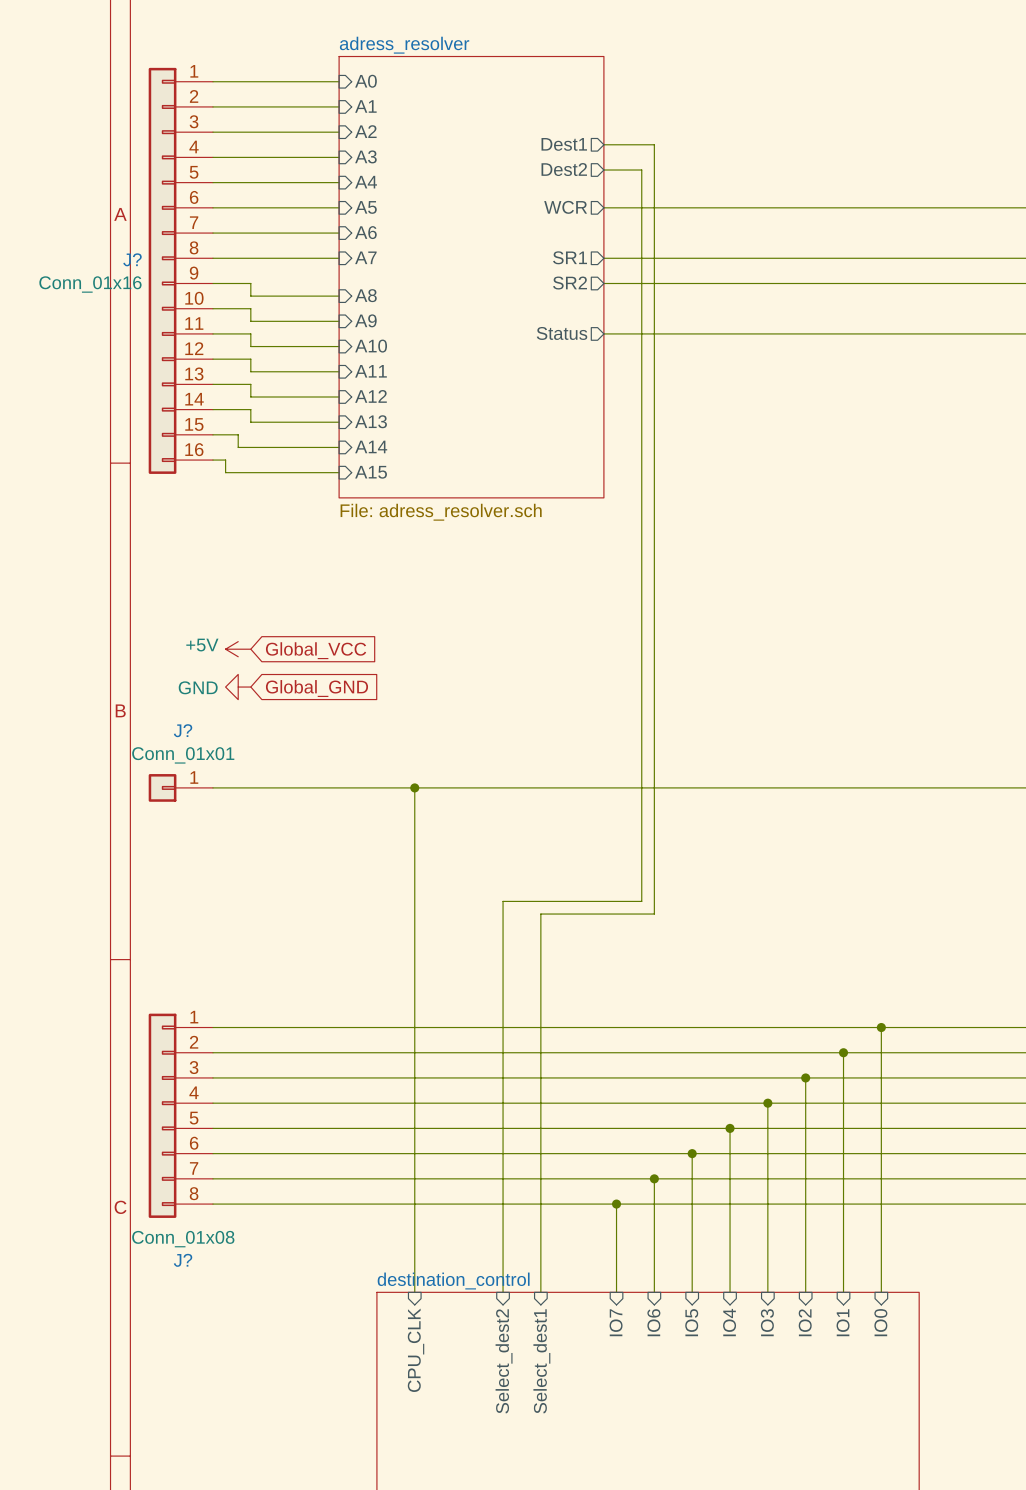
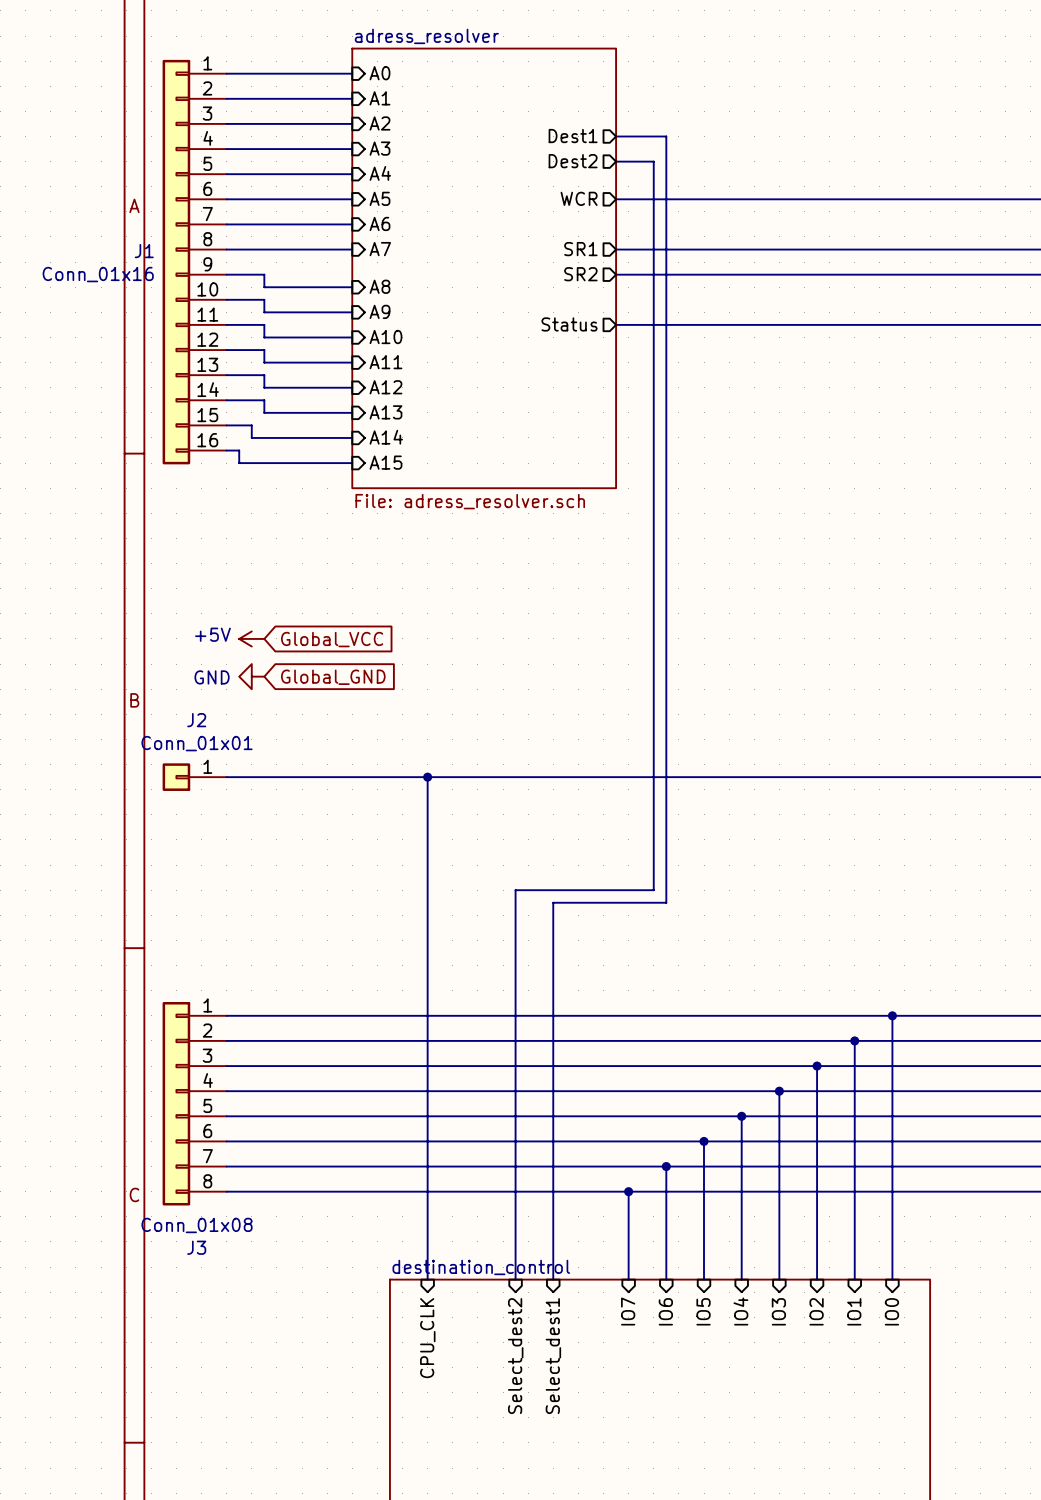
J? name: J? (132, 259) -> J1 (144, 251)
J? name: J? (183, 730) -> J2 (196, 720)
J? name: J? (183, 1260) -> J3 (196, 1247)

